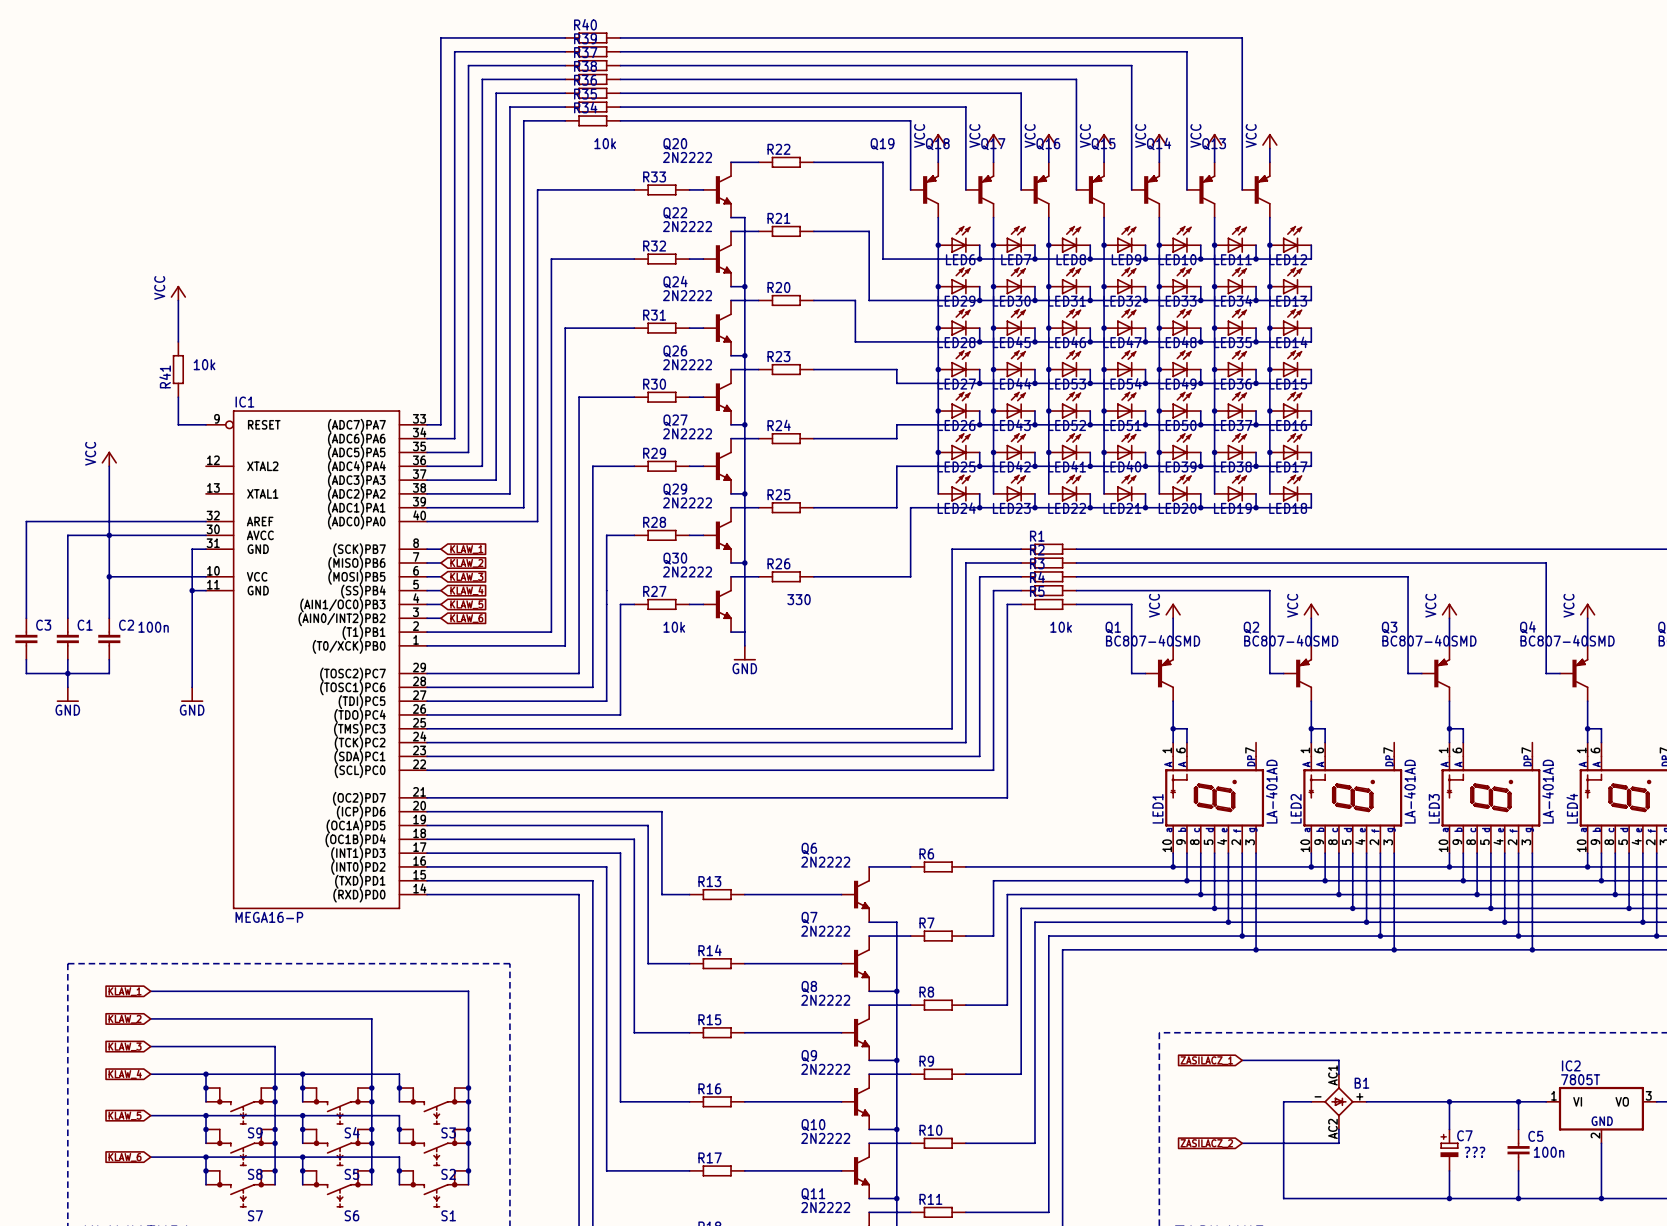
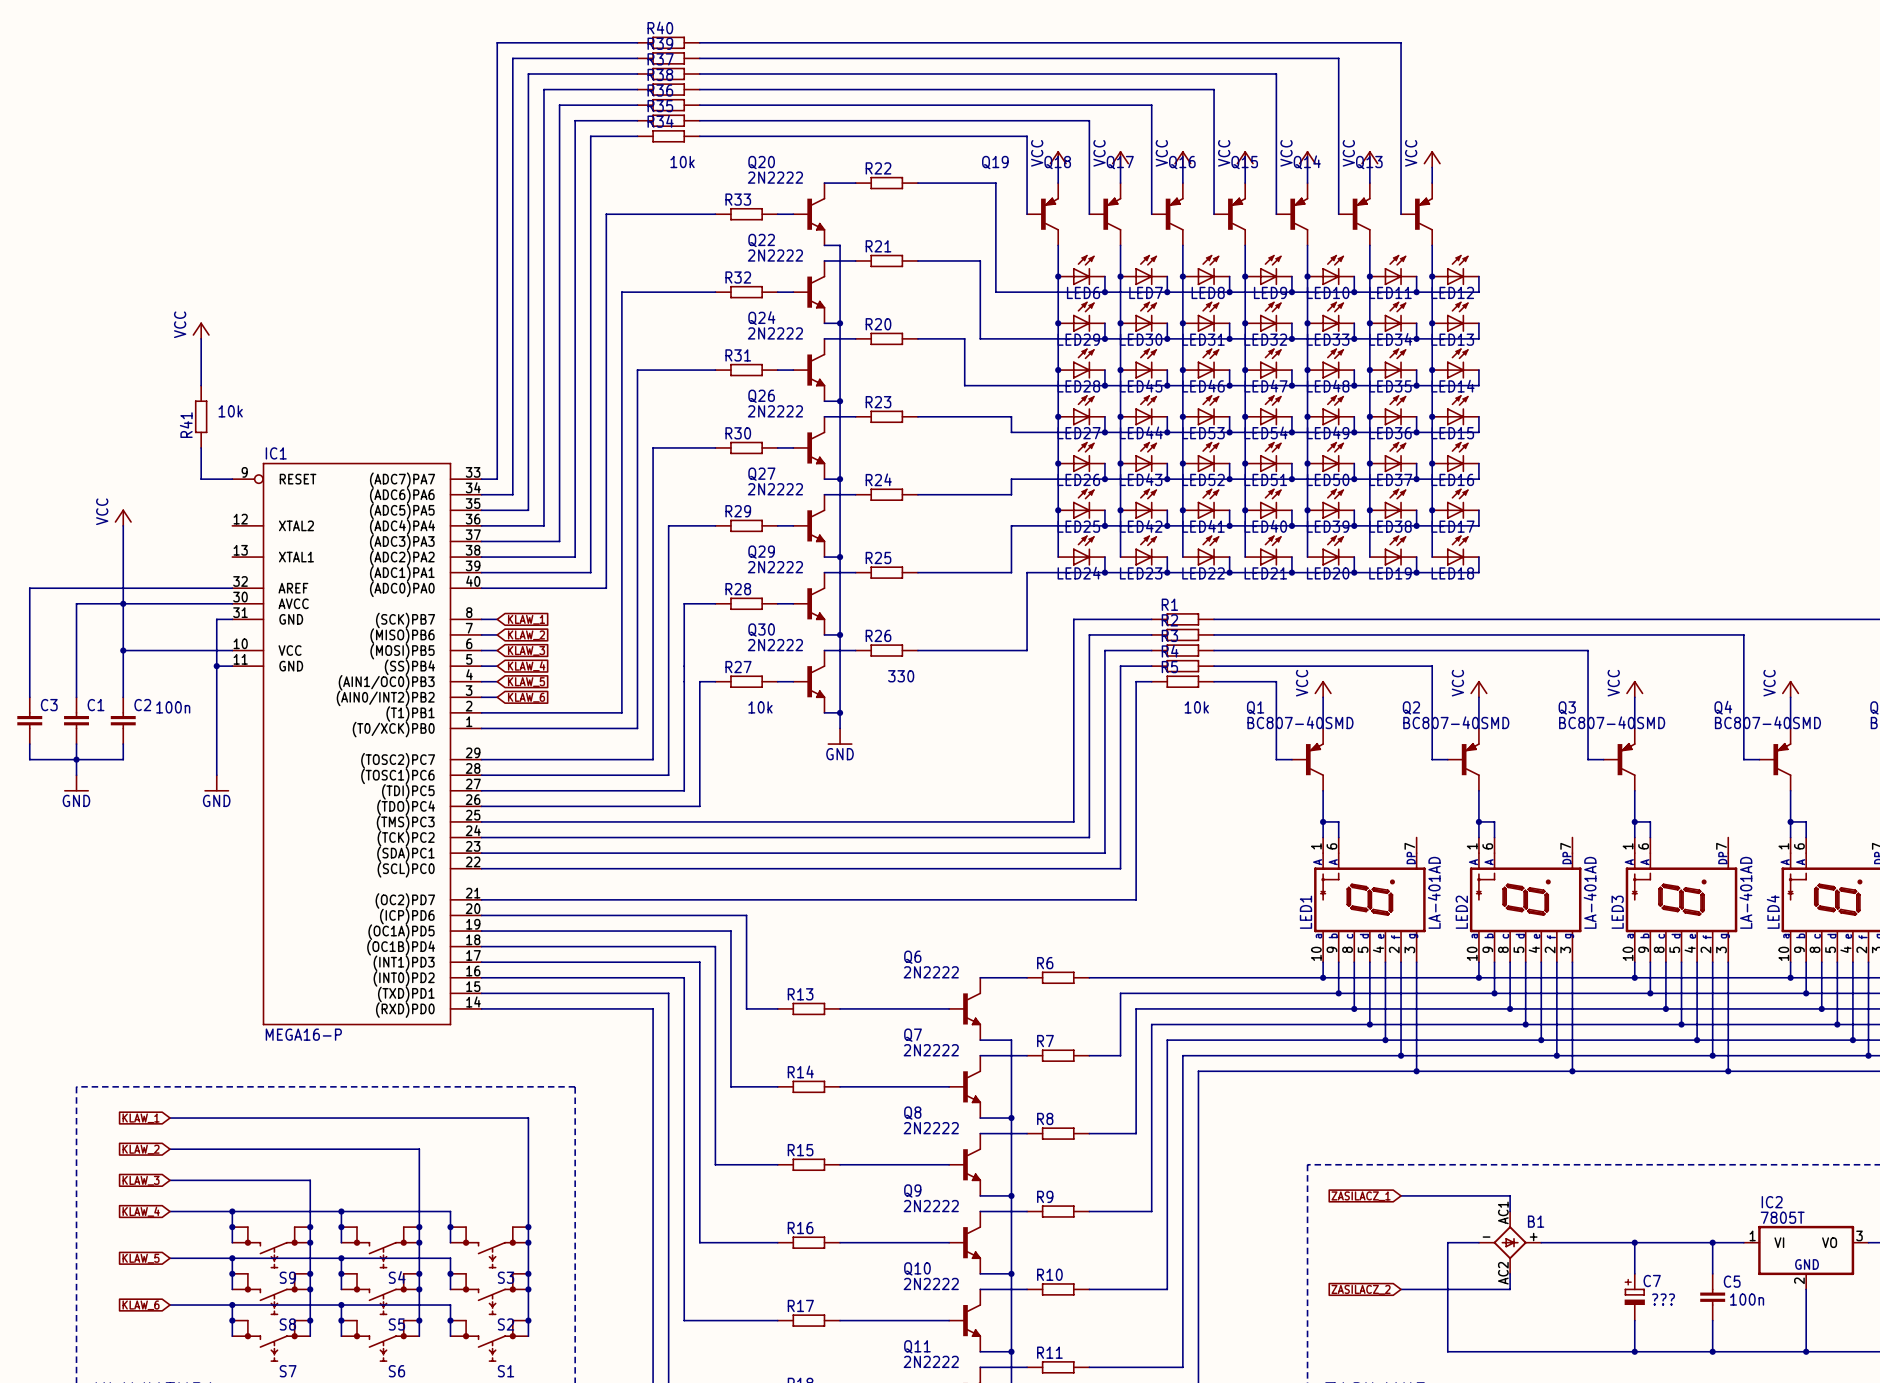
junction: none -> (840, 712)

